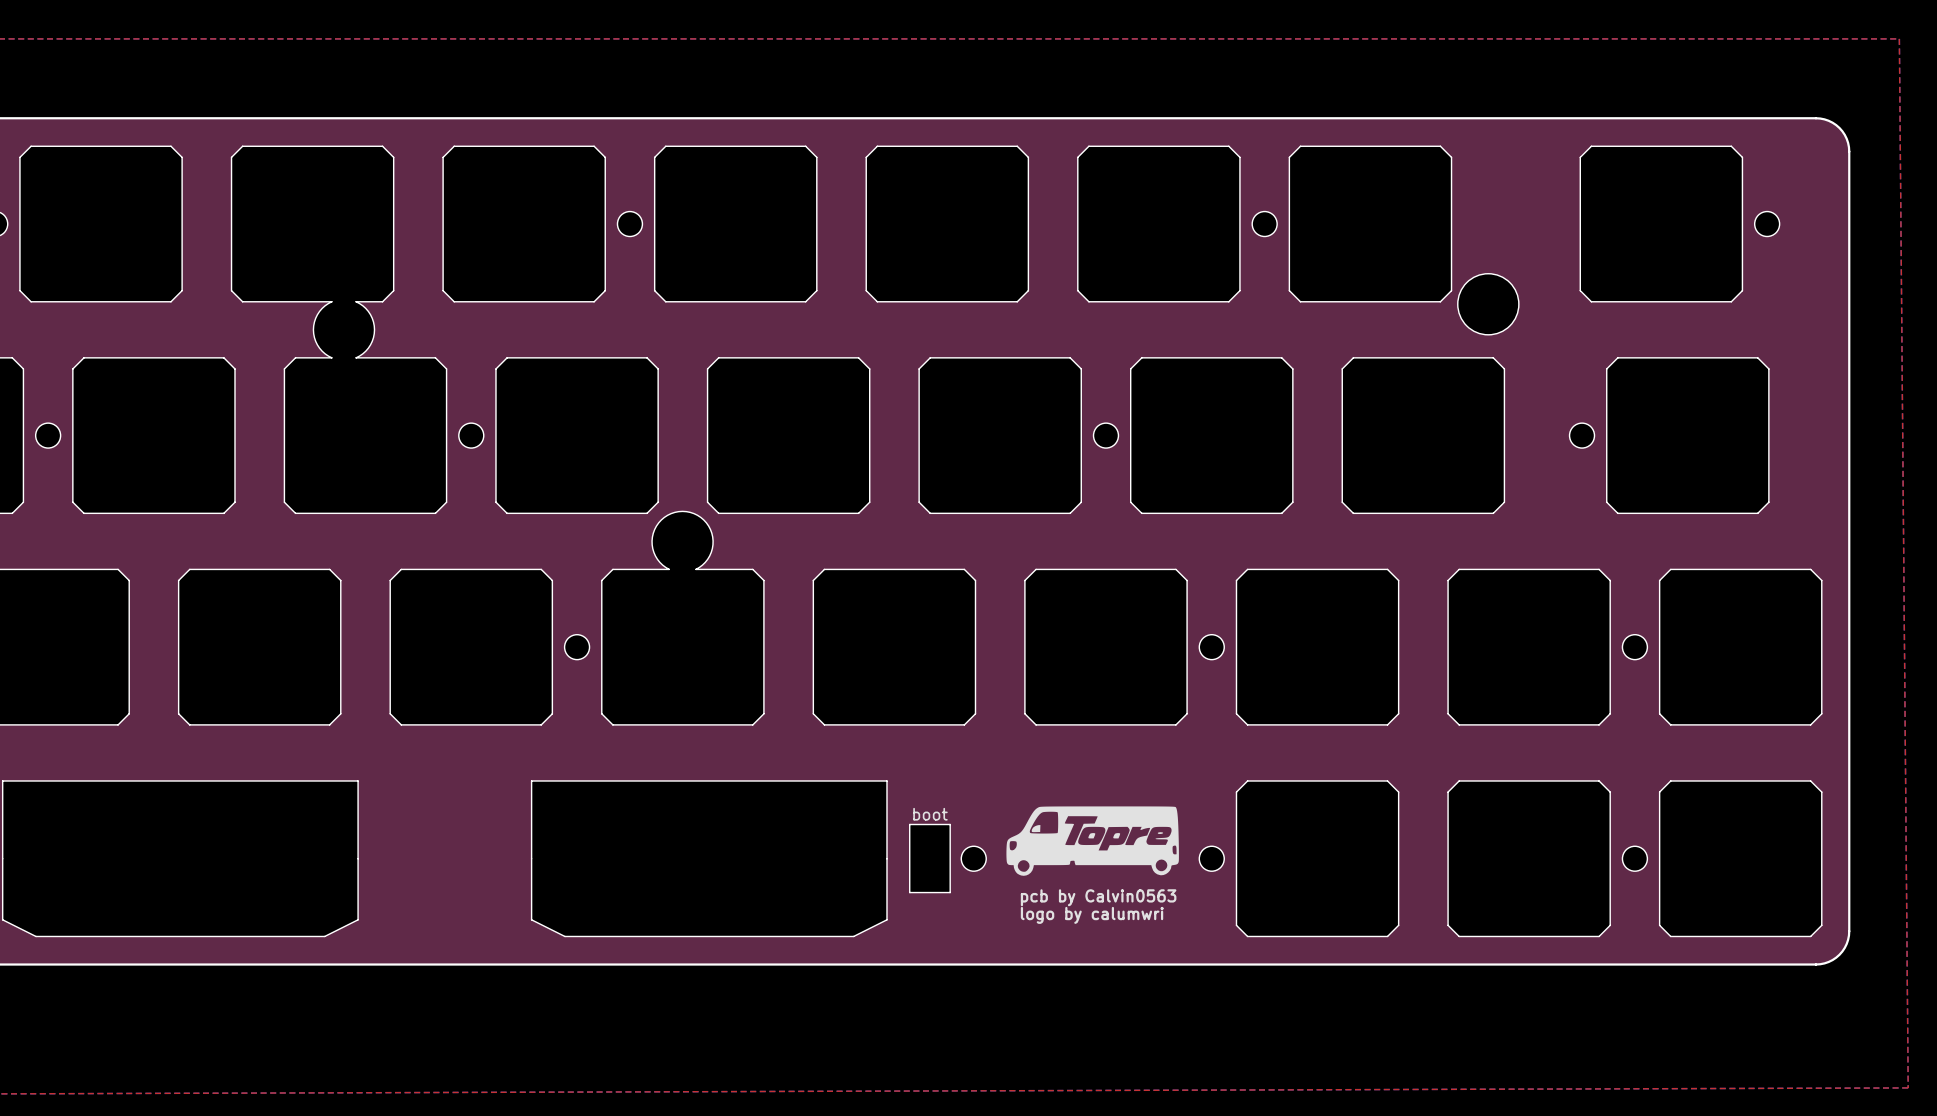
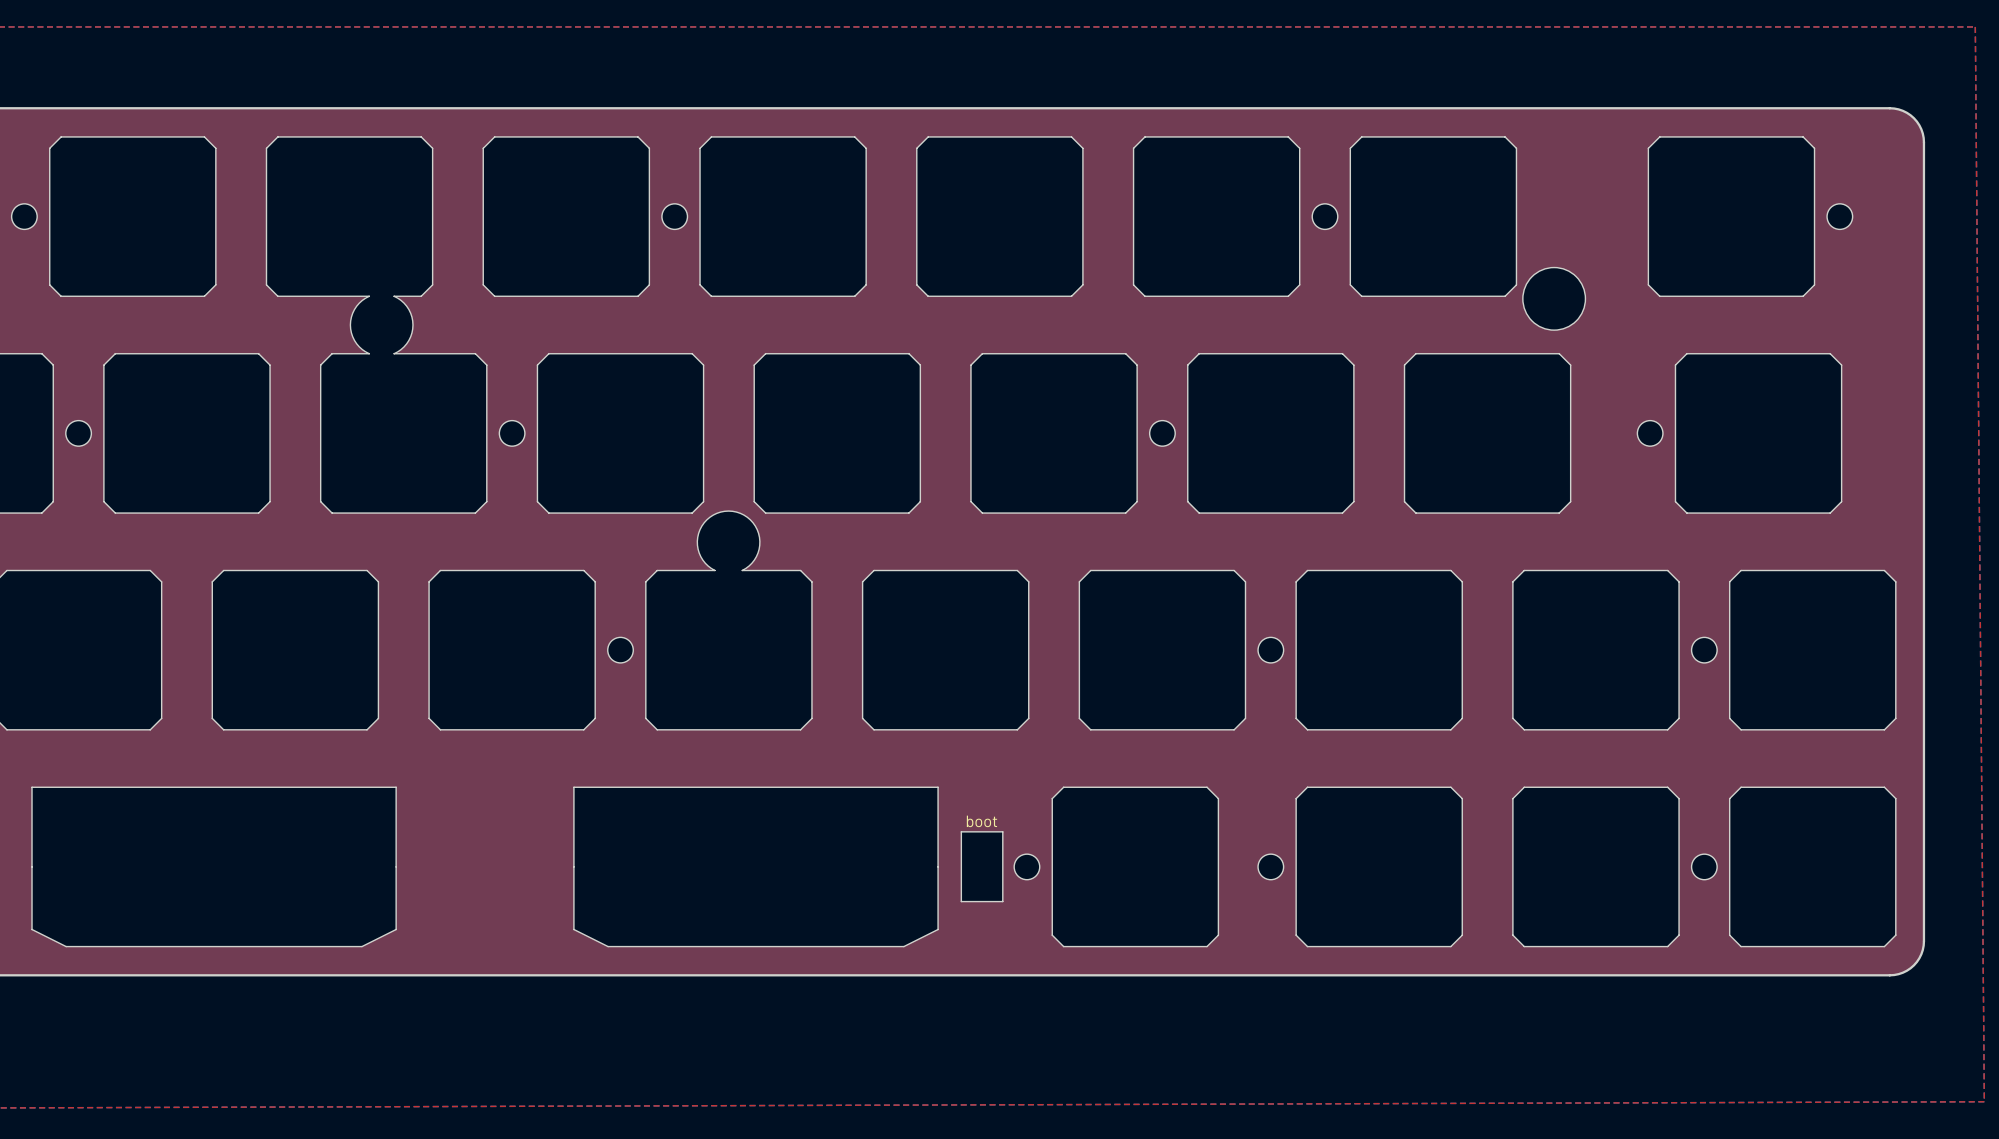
drawing: none -> [1051, 786, 1220, 948]
drawing: [1006, 806, 1179, 876] -> none
text: pcb by Calvin0563 (1098, 897) -> none
text: logo by calumwri (1092, 915) -> none

